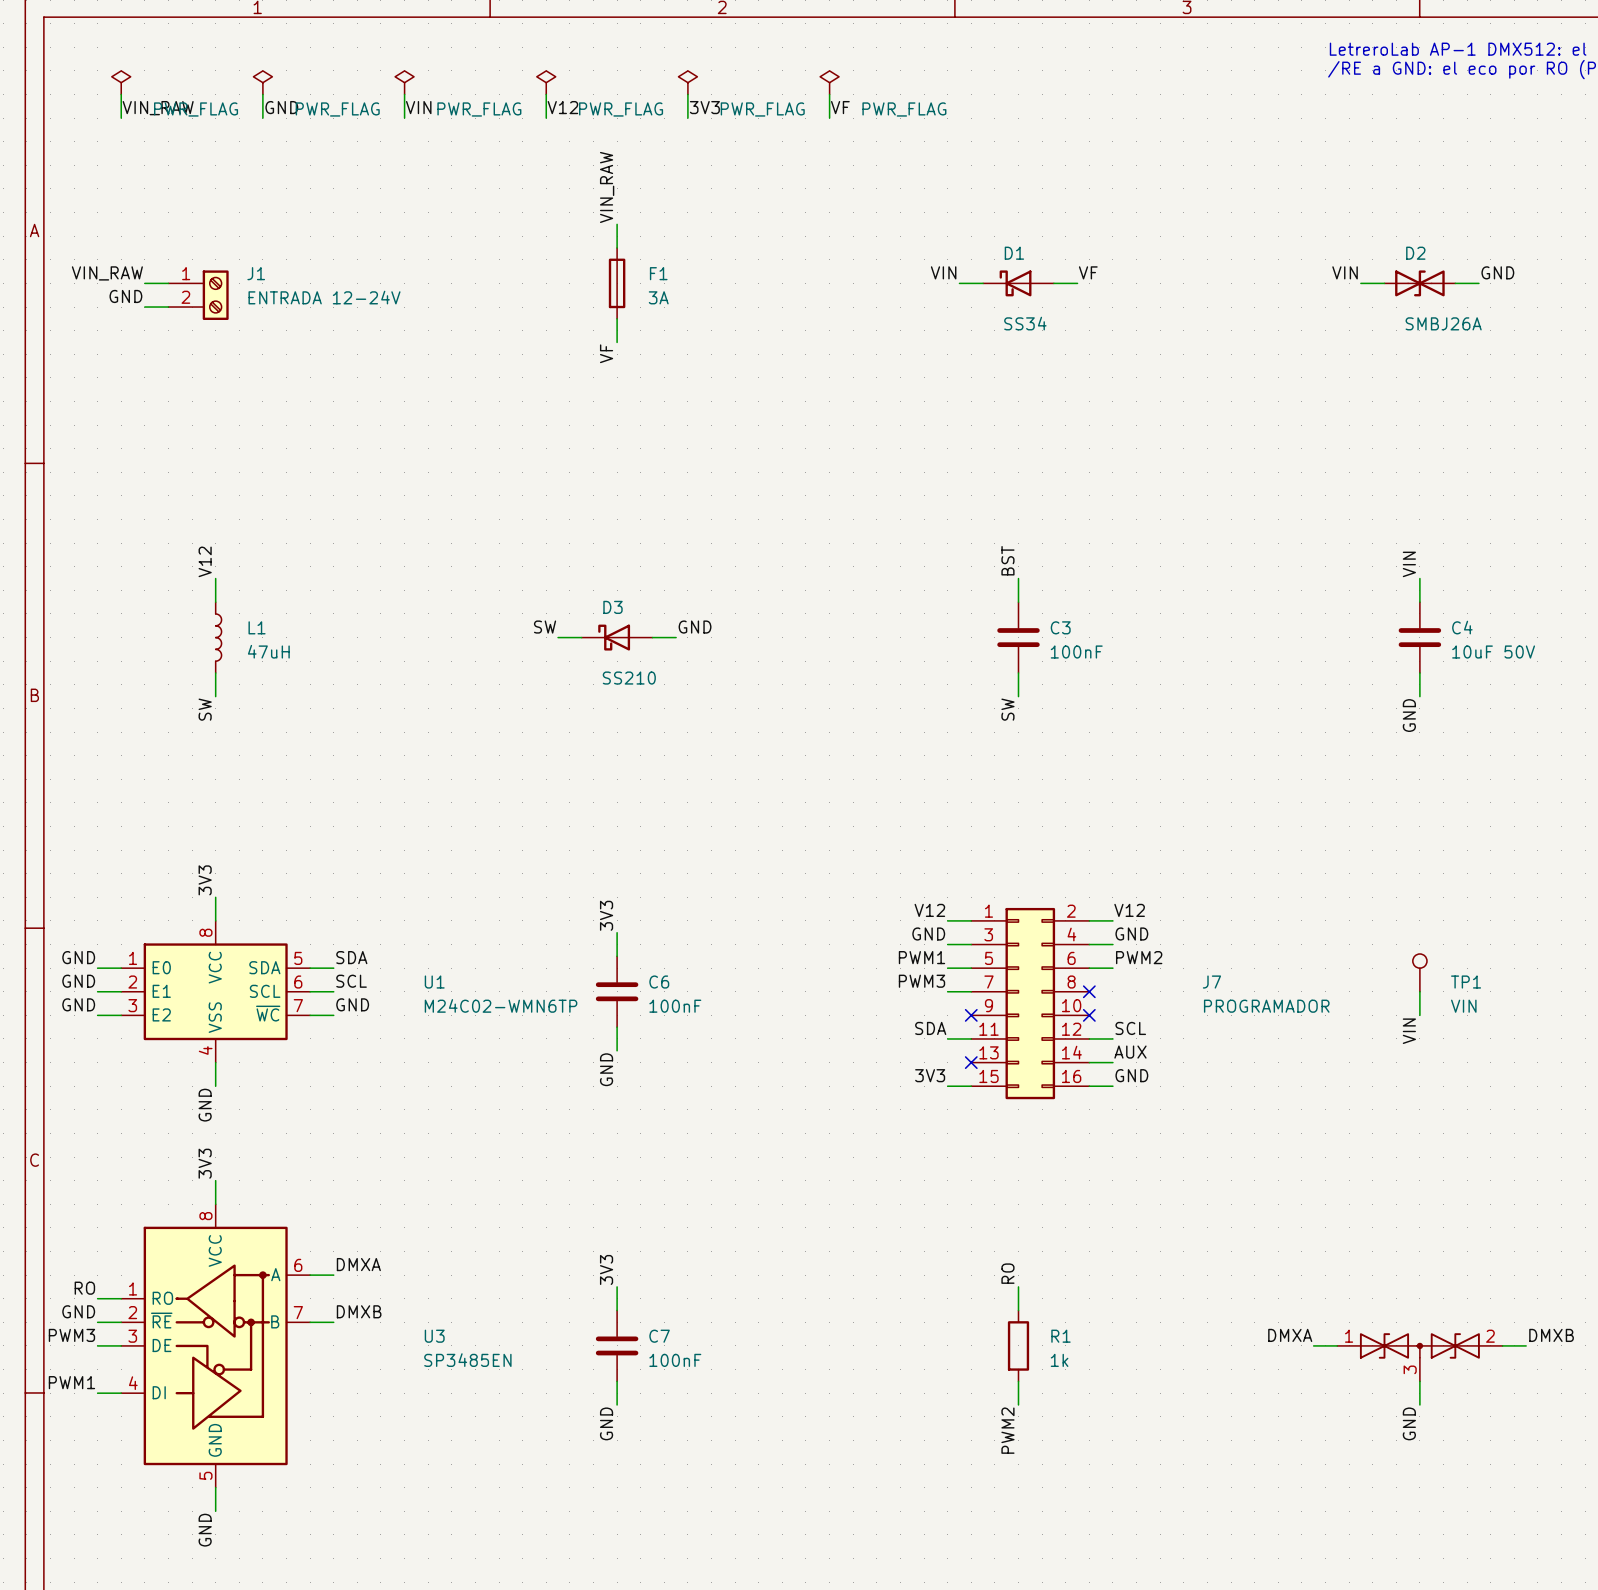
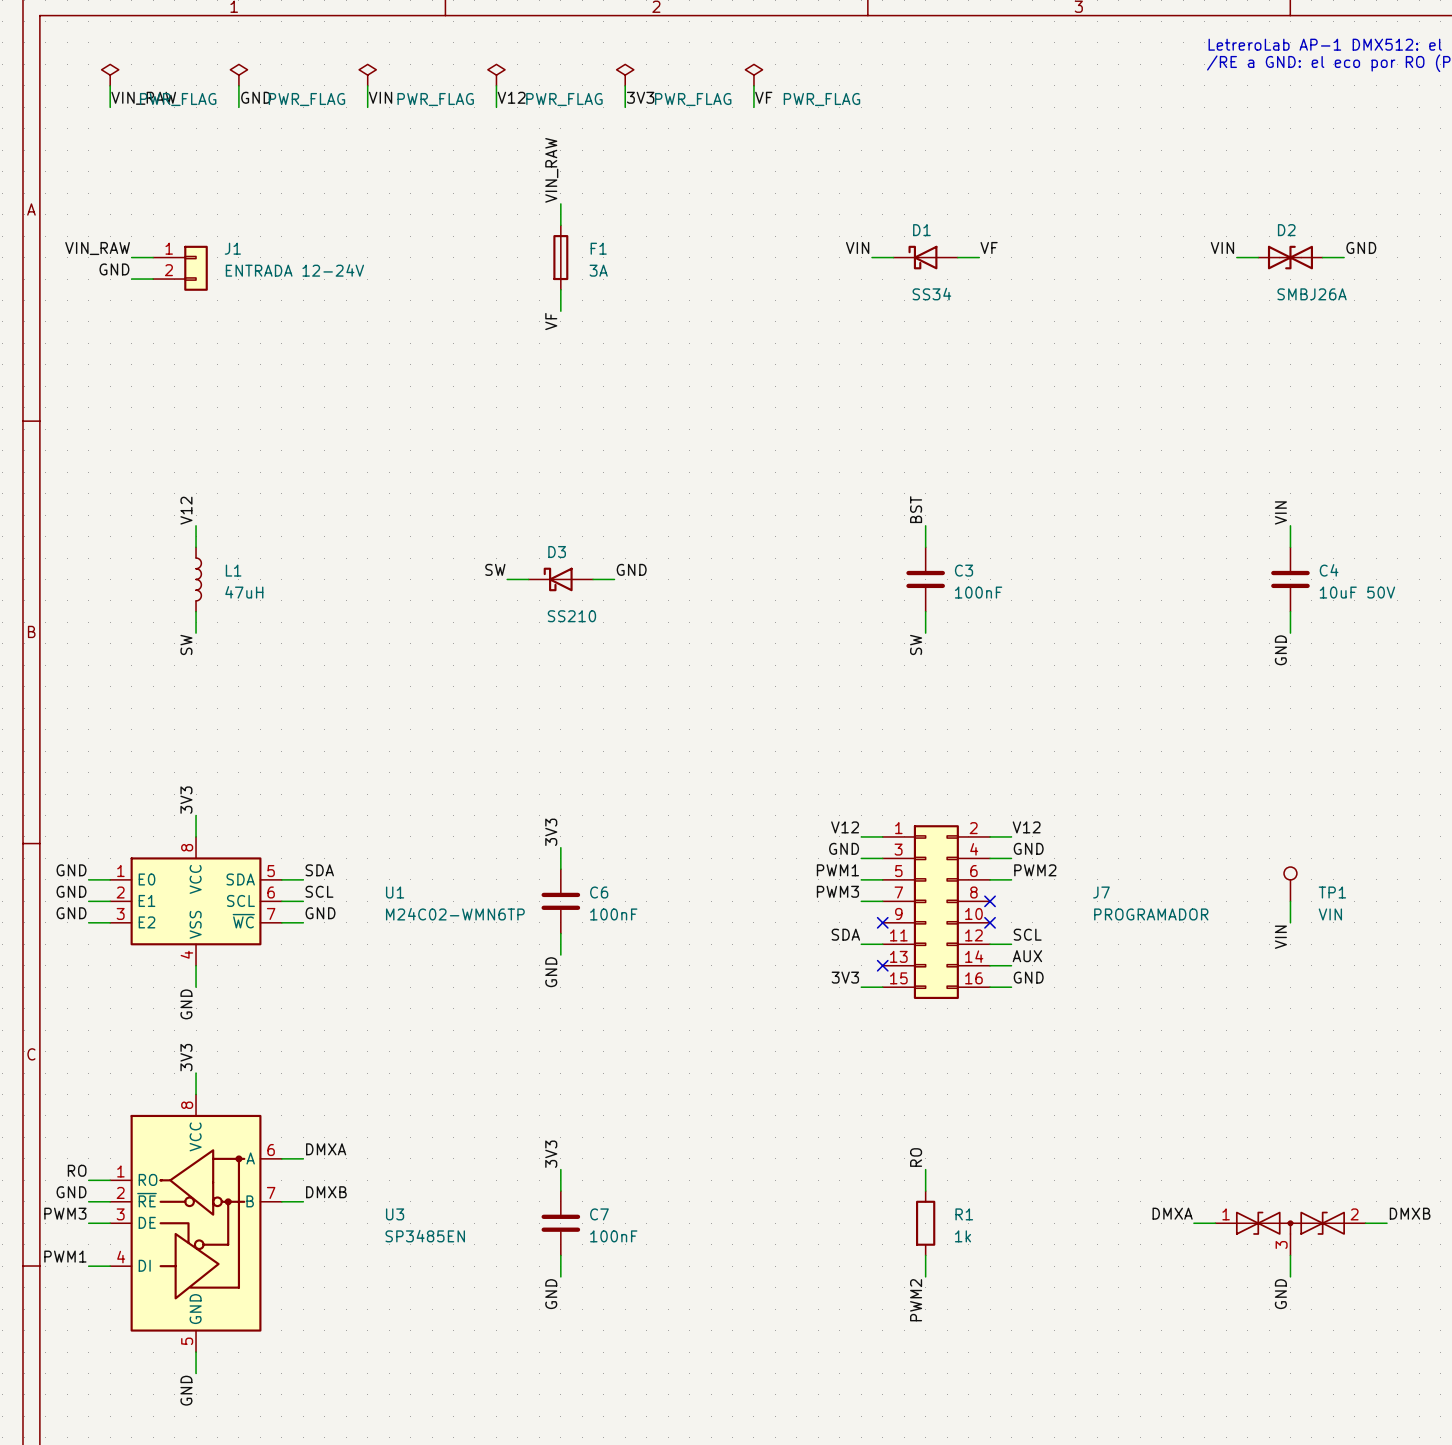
J1 symbol: [168, 270, 229, 321] -> [153, 245, 208, 291]

